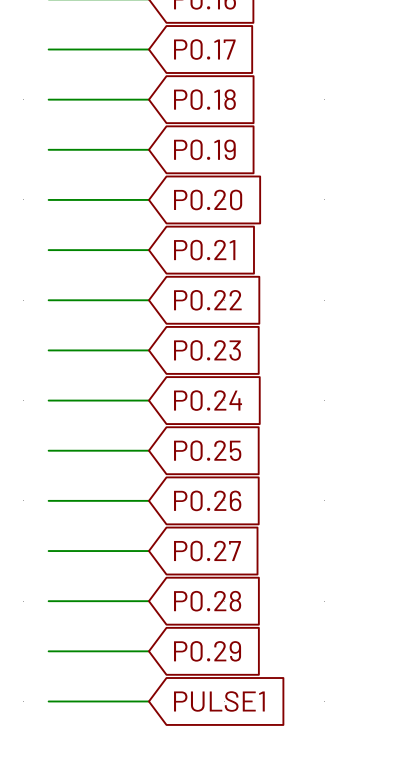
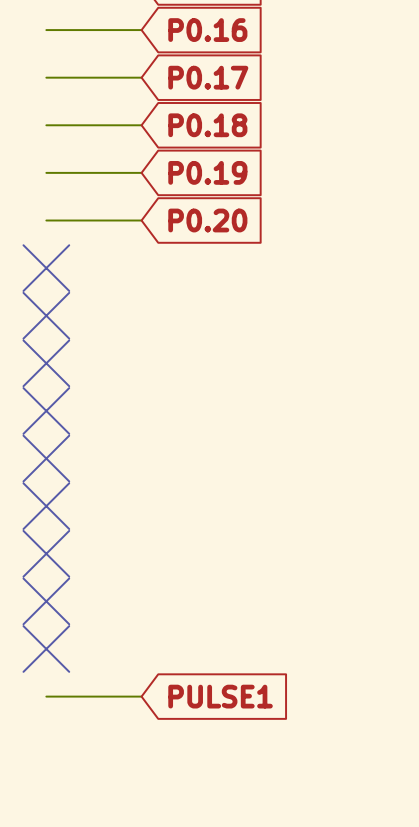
wire: (48, 250) (148, 250) -> none
no-connect mark: none -> (46, 268)
global label: P0.21 (204, 250) -> none
wire: (48, 300) (148, 300) -> none
no-connect mark: none -> (46, 315)
global label: P0.22 (207, 300) -> none
wire: (48, 350) (148, 350) -> none
no-connect mark: none -> (46, 363)
global label: P0.23 (207, 350) -> none
wire: (48, 400) (148, 400) -> none
no-connect mark: none -> (46, 410)
global label: P0.24 (208, 400) -> none
wire: (48, 450) (148, 450) -> none
no-connect mark: none -> (46, 458)
global label: P0.25 (207, 450) -> none
wire: (48, 500) (148, 500) -> none
no-connect mark: none -> (46, 506)
global label: P0.26 (207, 500) -> none
wire: (48, 551) (148, 551) -> none
no-connect mark: none -> (46, 553)
global label: P0.27 (207, 551) -> none
wire: (48, 601) (148, 601) -> none
no-connect mark: none -> (46, 601)
global label: P0.28 (207, 601) -> none
wire: (48, 651) (148, 651) -> none
no-connect mark: none -> (46, 648)
global label: P0.29 (207, 651) -> none

